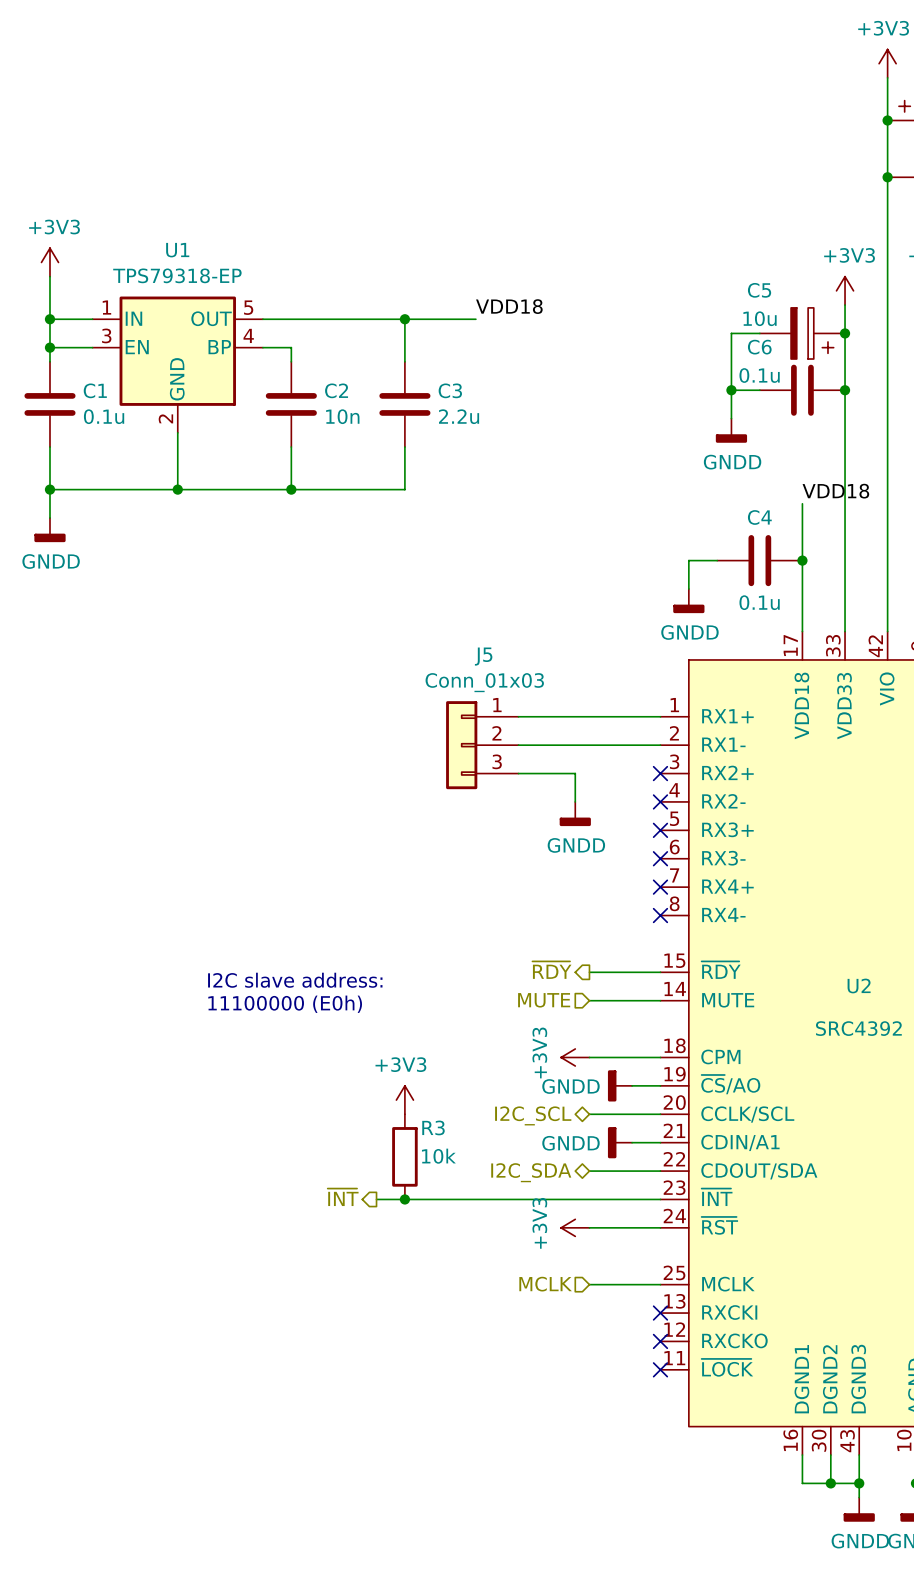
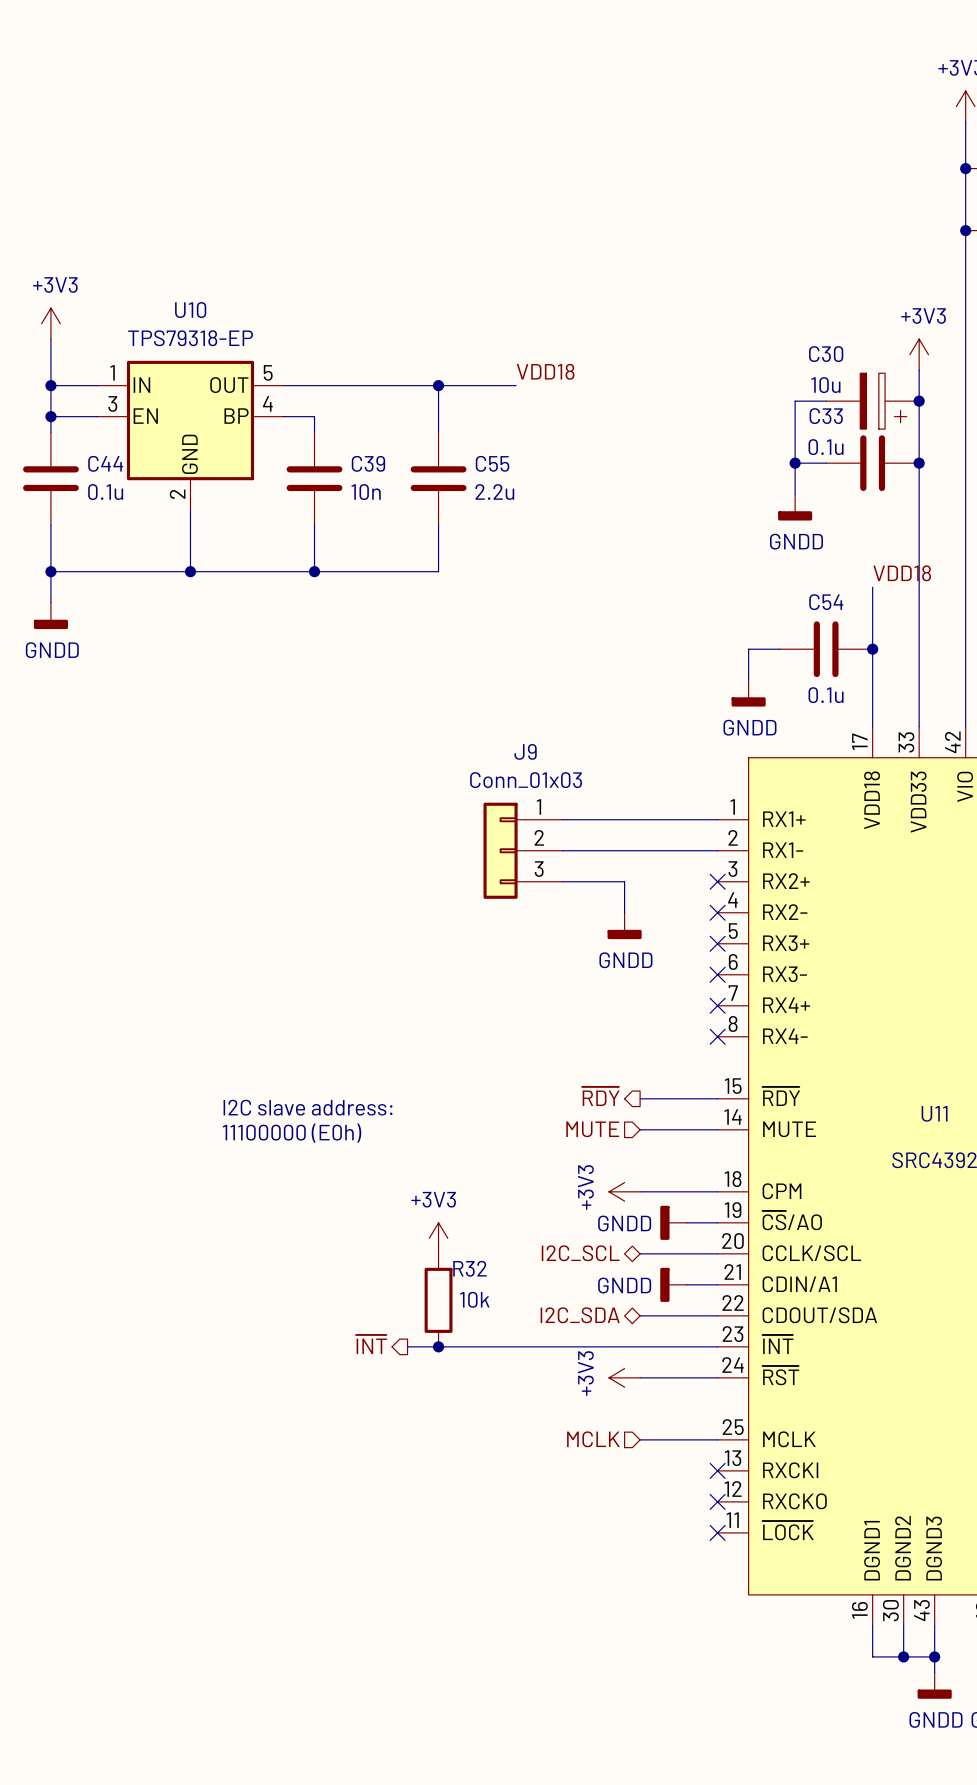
U1 name: U1 (177, 250) -> U10 (190, 310)
C5 name: C5 (759, 290) -> C30 (826, 354)
C6 name: C6 (759, 347) -> C33 (826, 416)
C1 name: C1 (95, 390) -> C44 (105, 463)
C2 name: C2 (336, 390) -> C39 (368, 463)
C3 name: C3 (450, 390) -> C55 (492, 463)
C4 name: C4 (759, 517) -> C54 (826, 602)
J5 name: J5 (483, 656) -> J9 (525, 751)
U2 name: U2 (859, 985) -> U11 (934, 1113)
R3 name: R3 (433, 1127) -> R32 (469, 1268)

